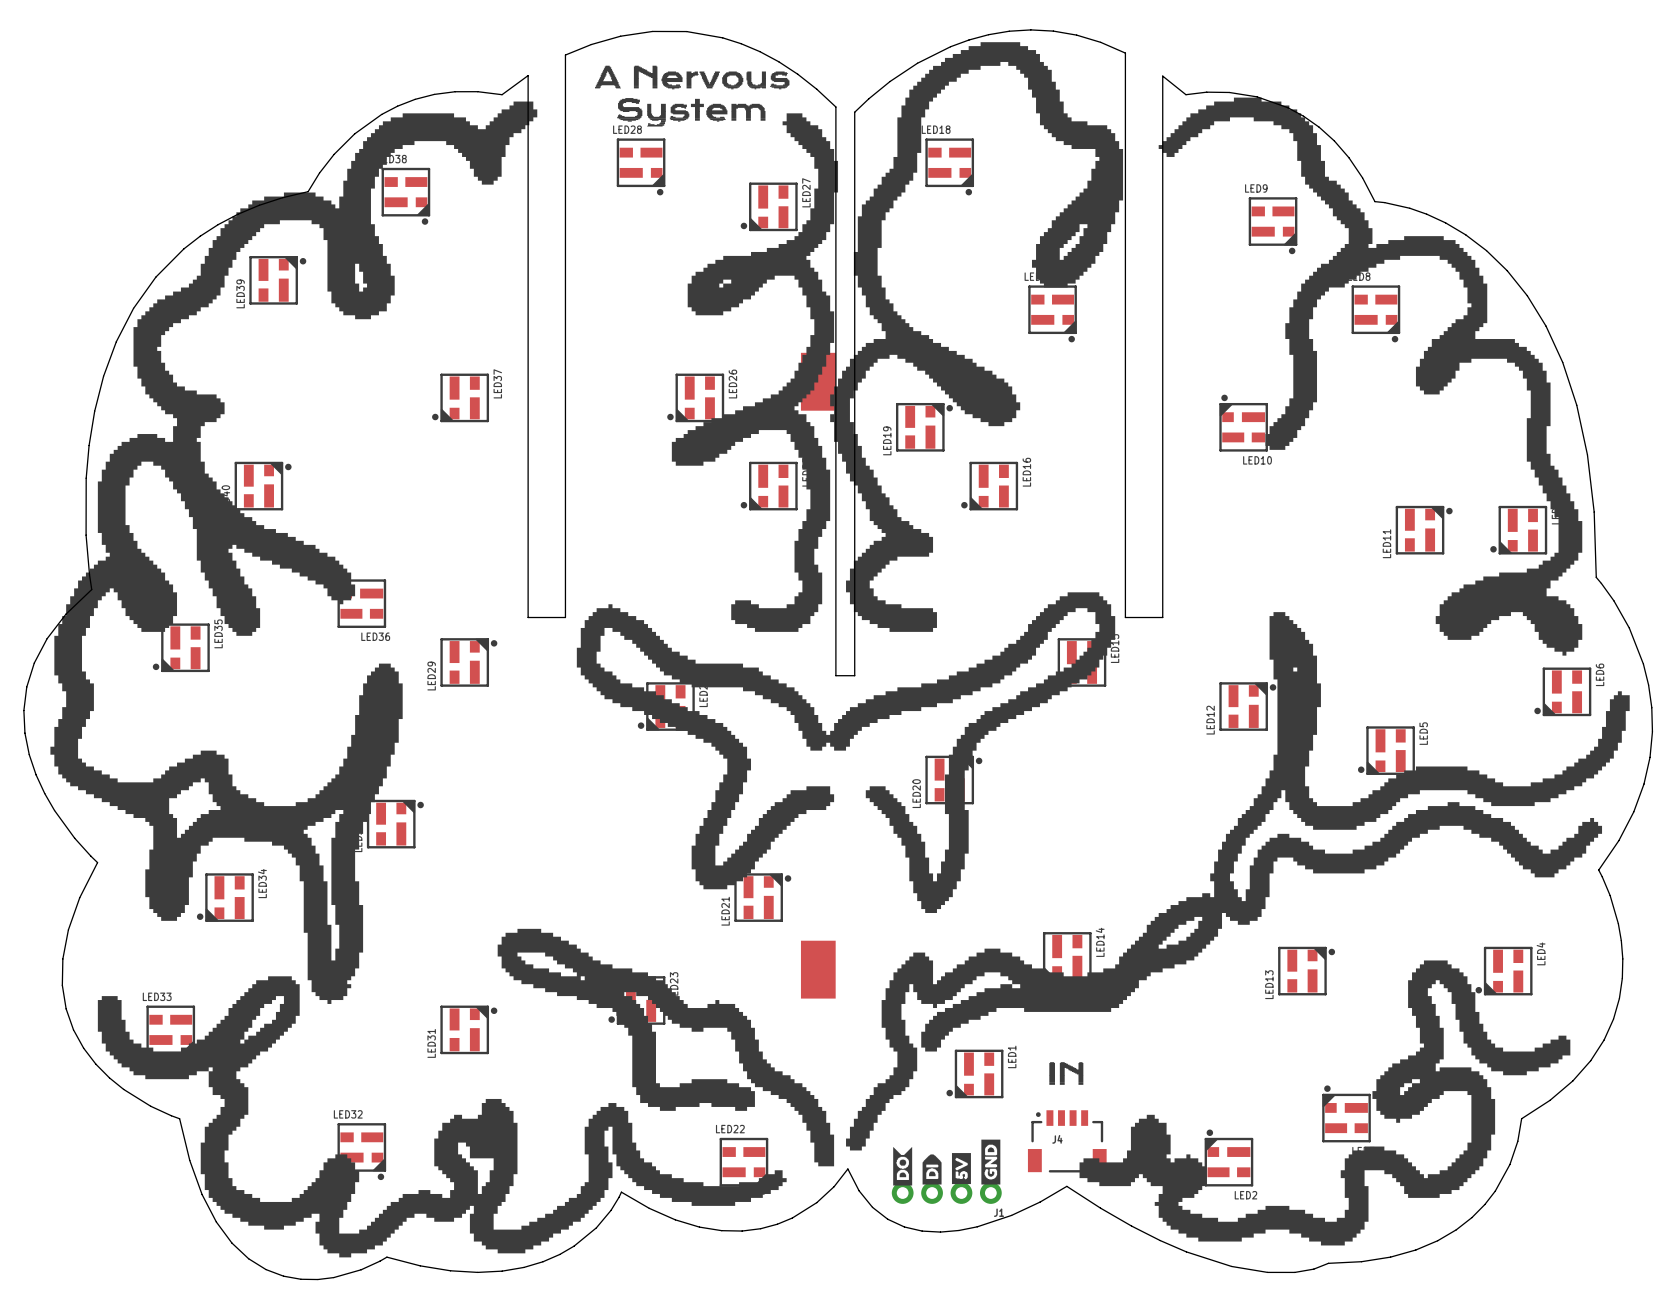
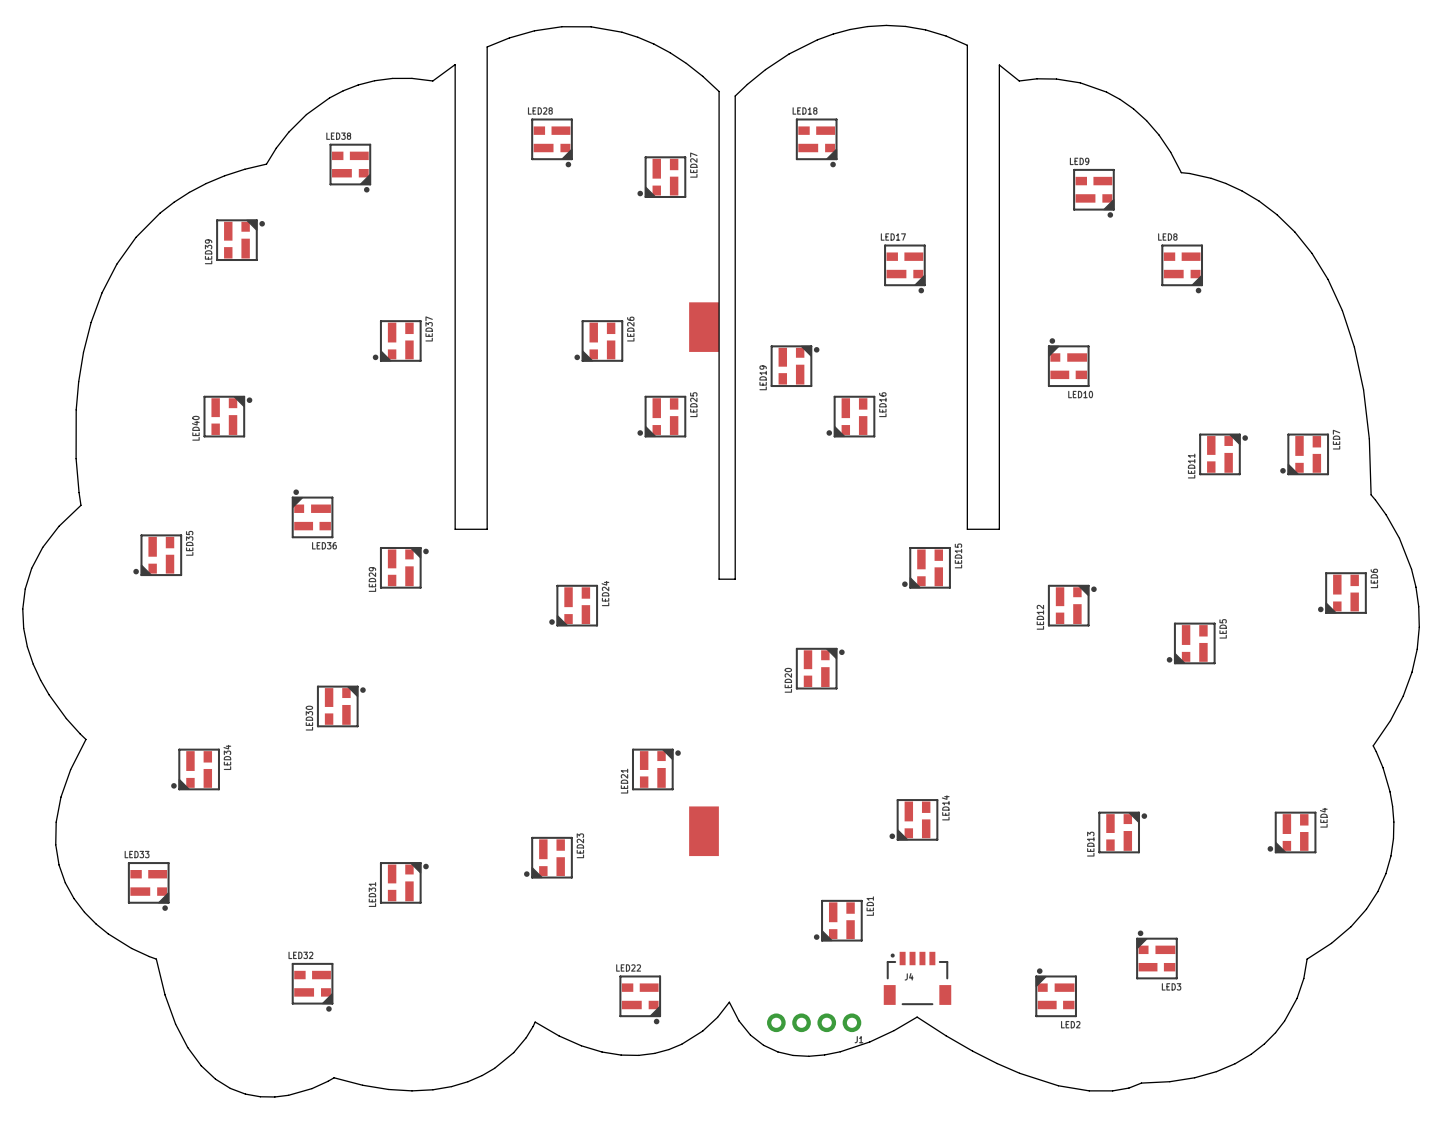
drawing: [50, 42, 1630, 1258] -> none

